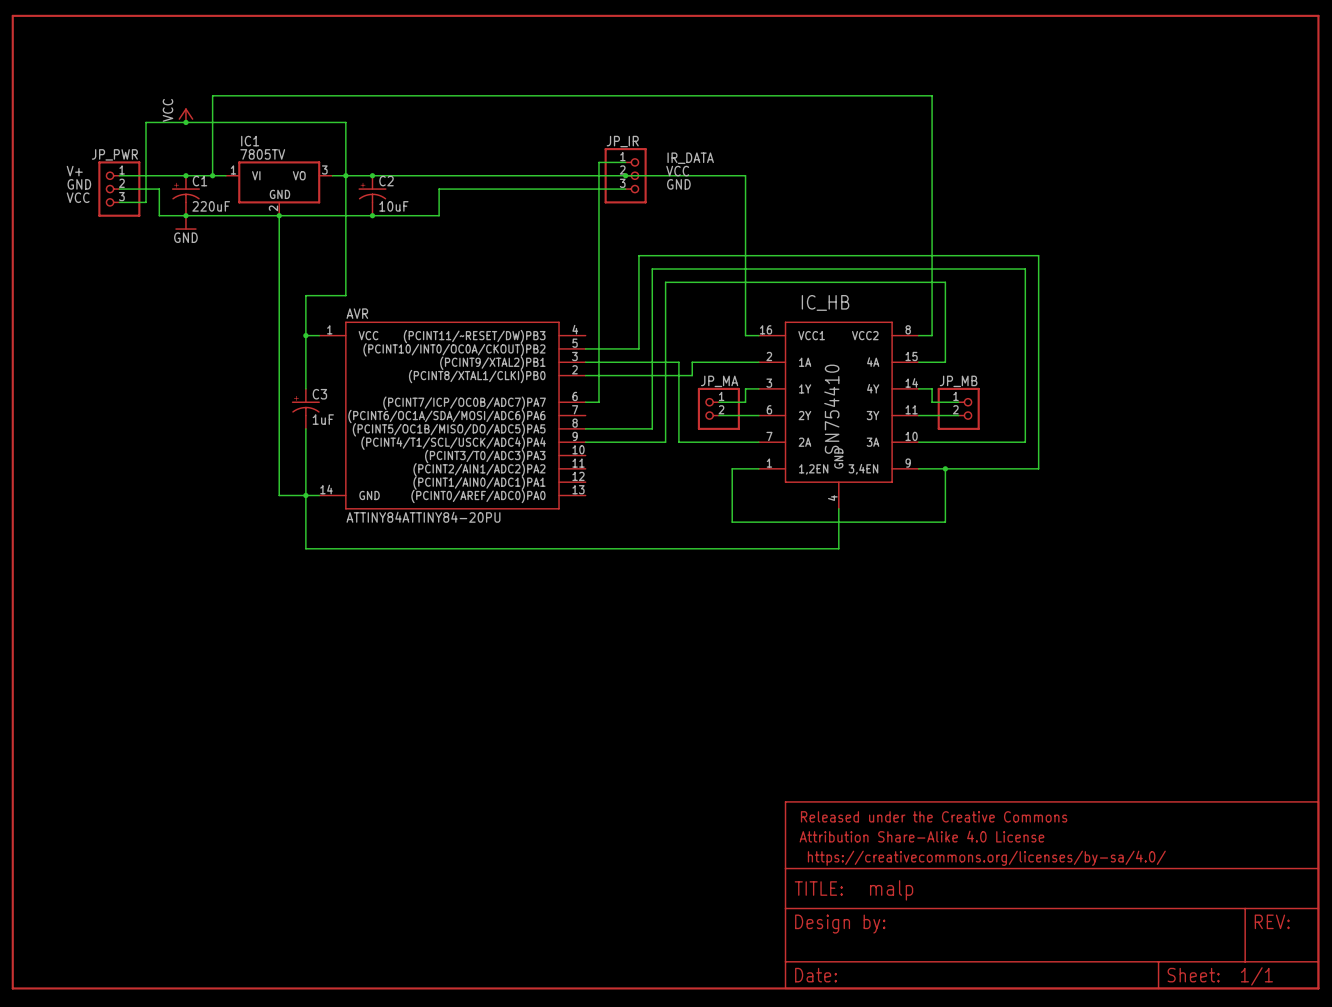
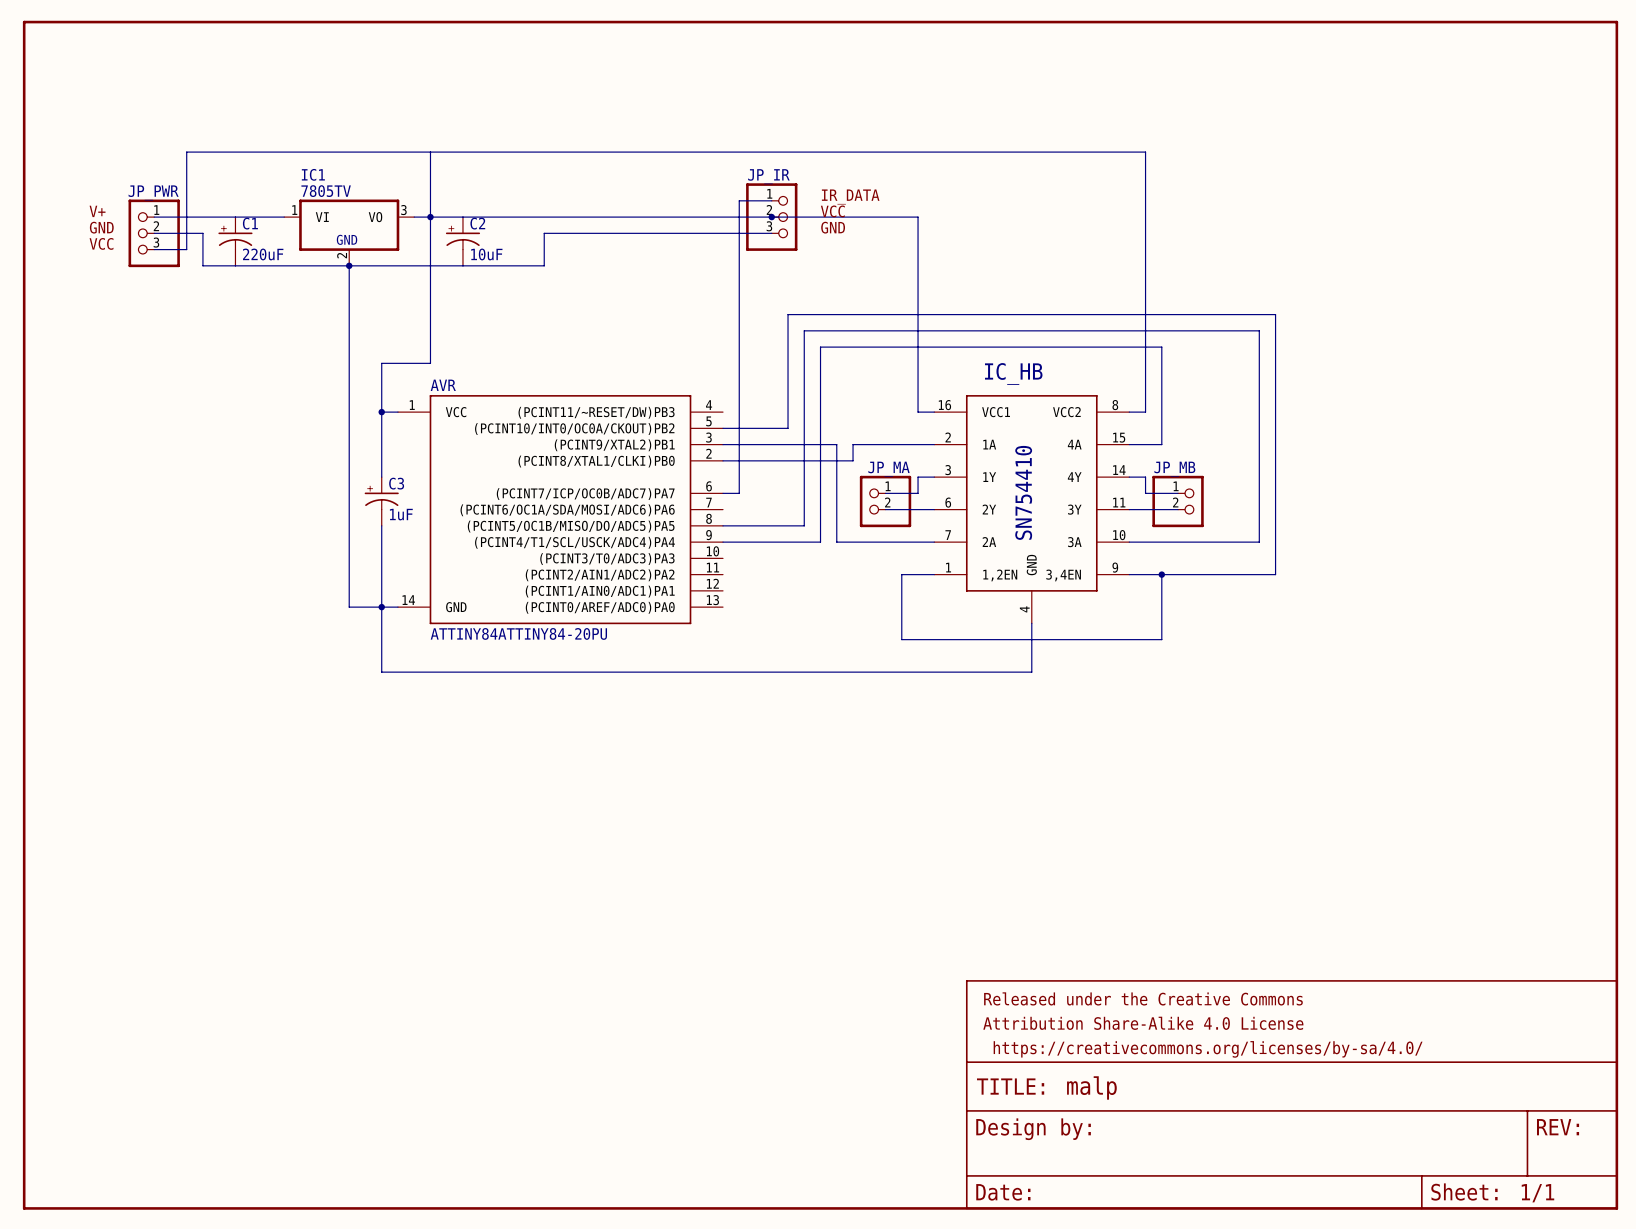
power symbol: VCC (185, 115) -> none
junction: (185, 122) -> none
wire: (932, 122) (932, 95) (212, 95) (212, 175) -> (1145, 152) (430, 152)
junction: (185, 175) -> none
junction: (212, 175) -> none
junction: (372, 175) -> none
junction: (185, 215) -> none
junction: (372, 215) -> none
power symbol: GND (185, 222) -> none

